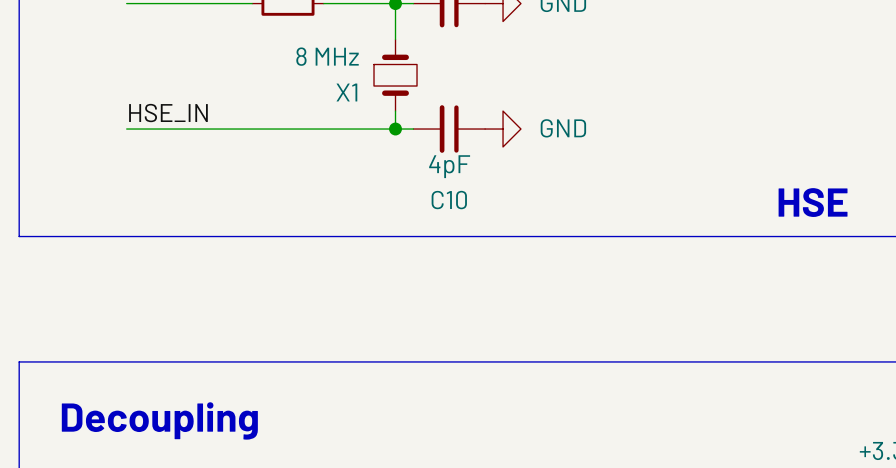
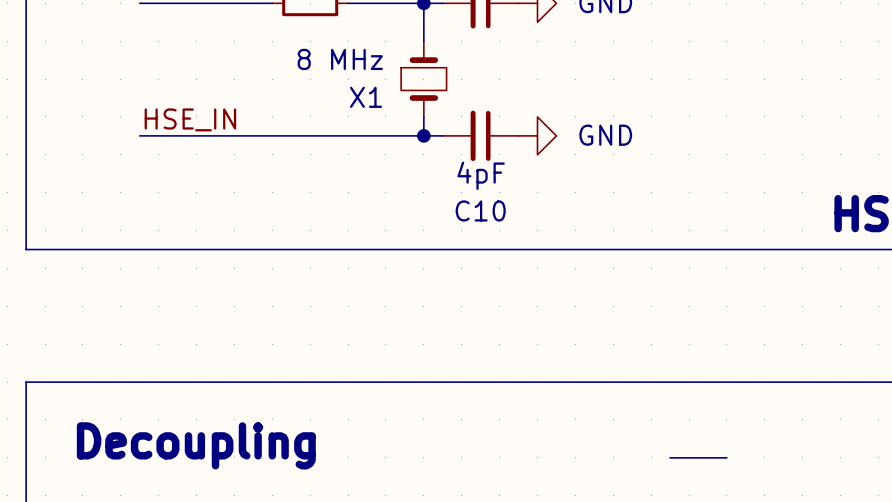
wire: none -> (670, 457) (726, 457)

